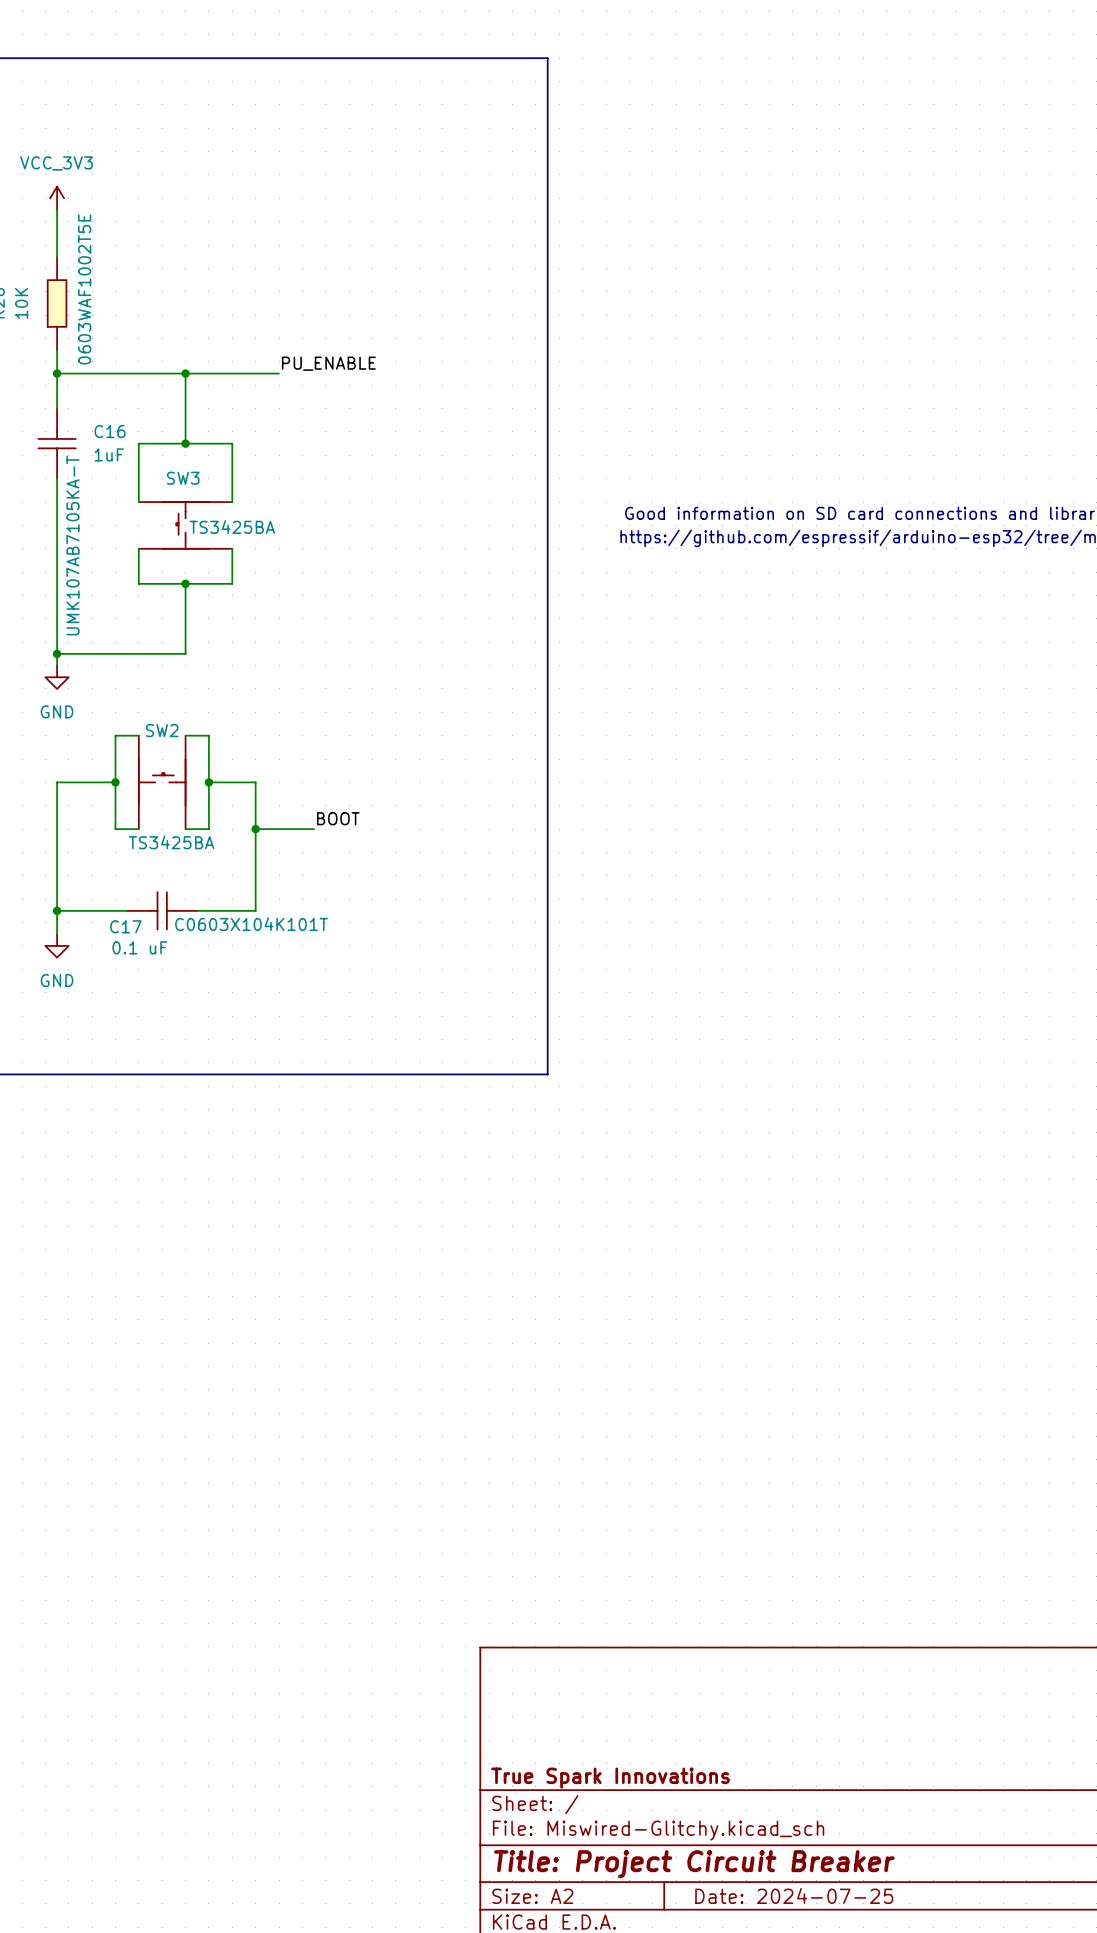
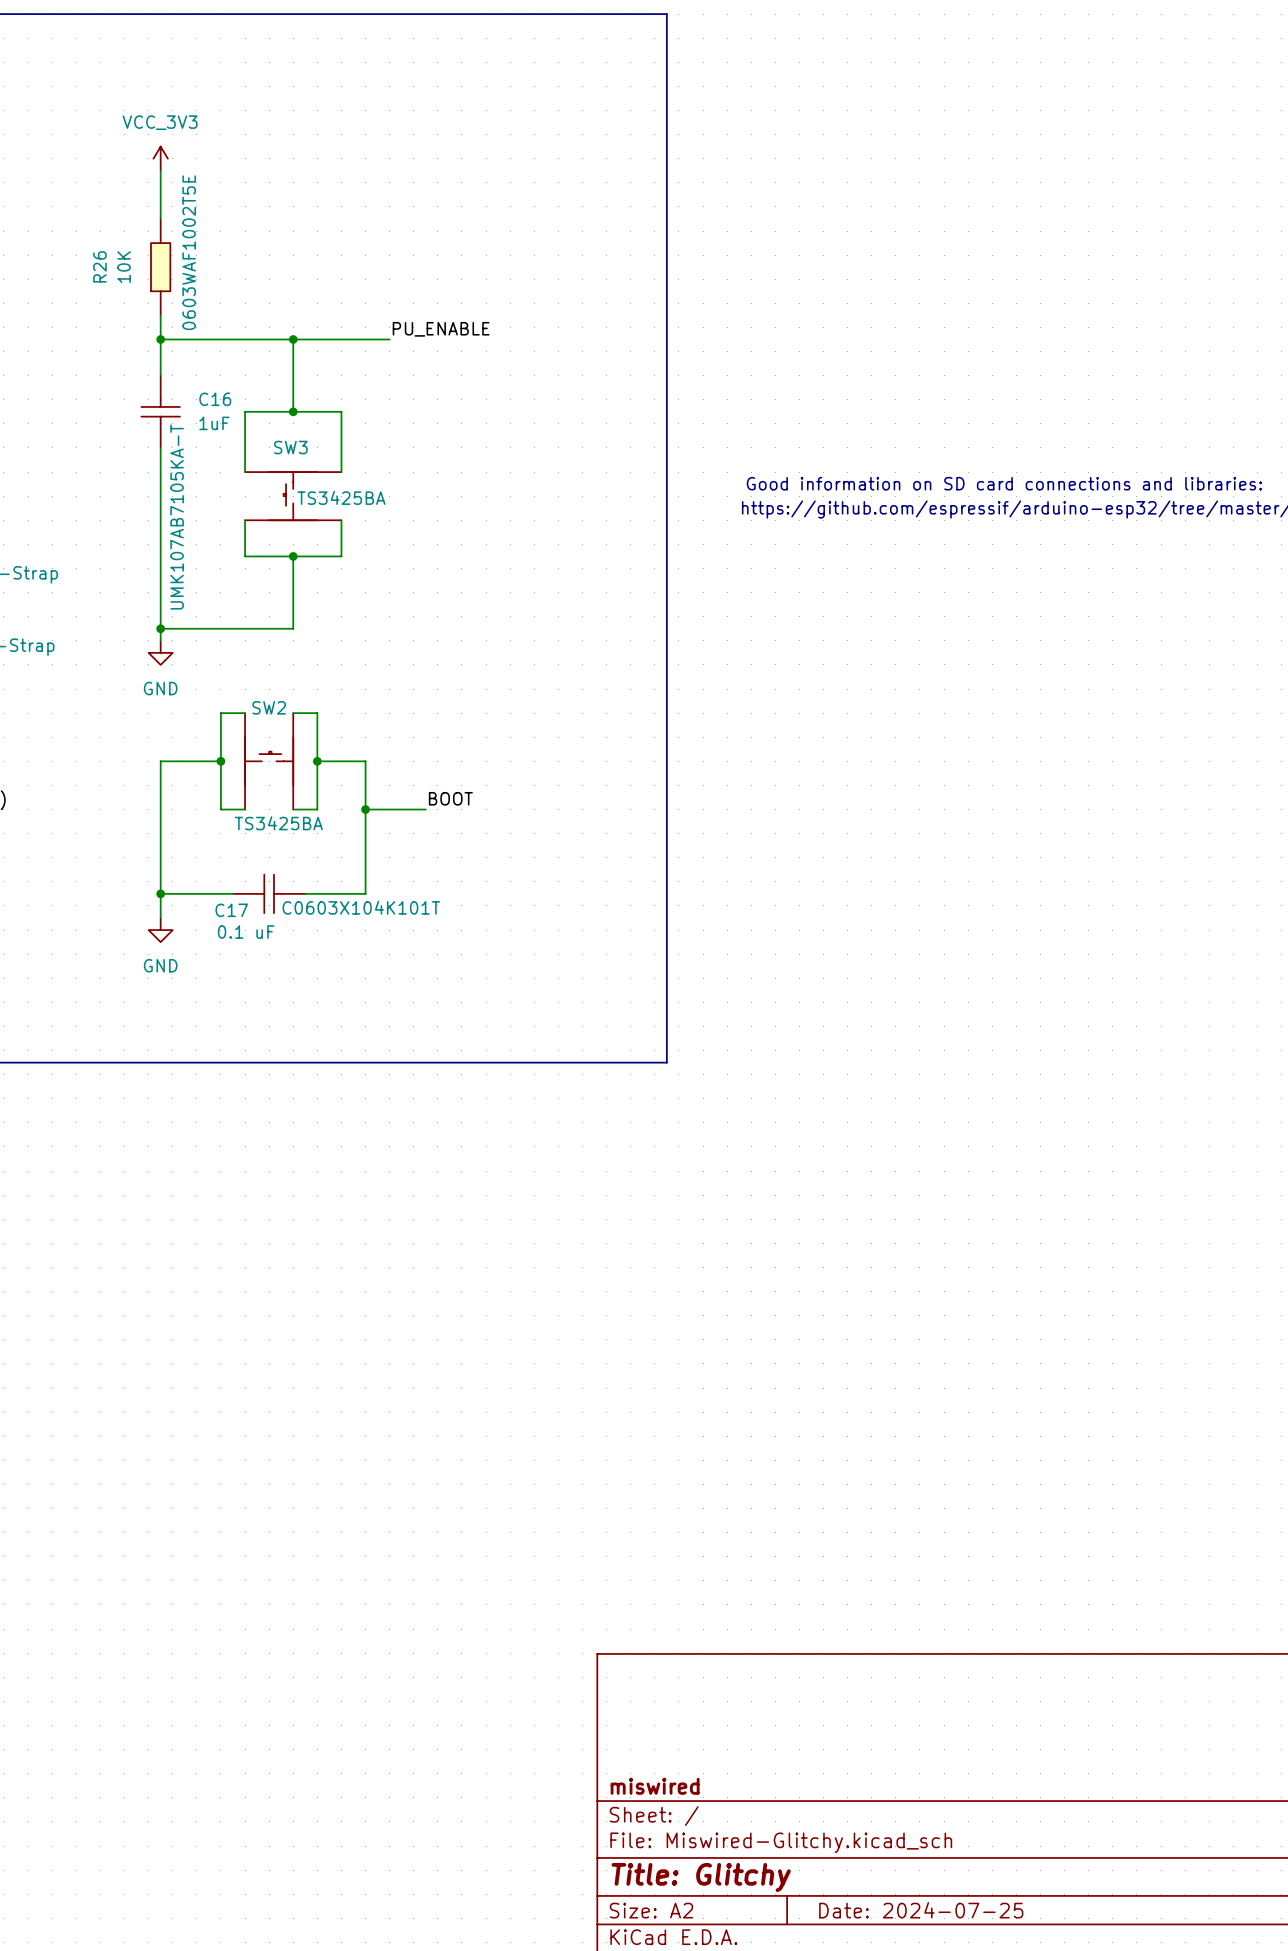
title block: True Spark Innovations (610, 1778) -> miswired (655, 1786)
title block: Title: Project Circuit Breaker (694, 1864) -> Title: Glitchy (701, 1877)

